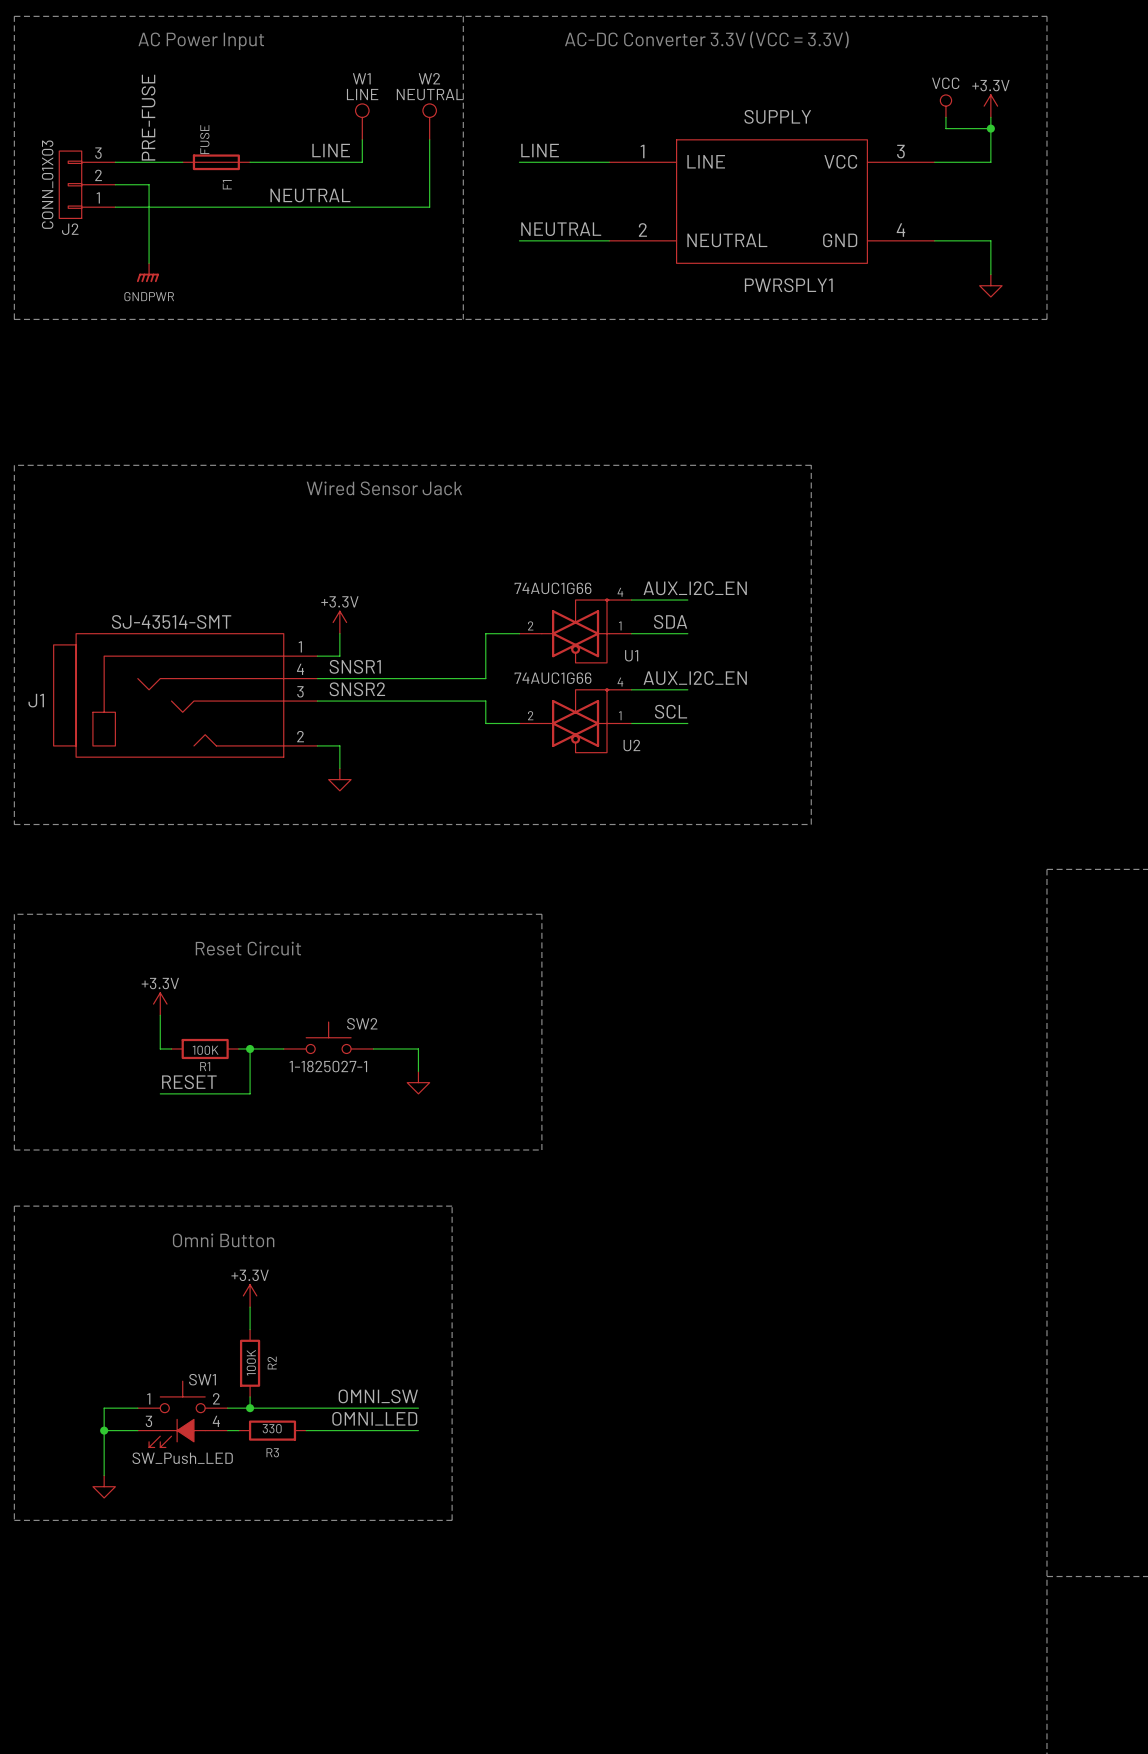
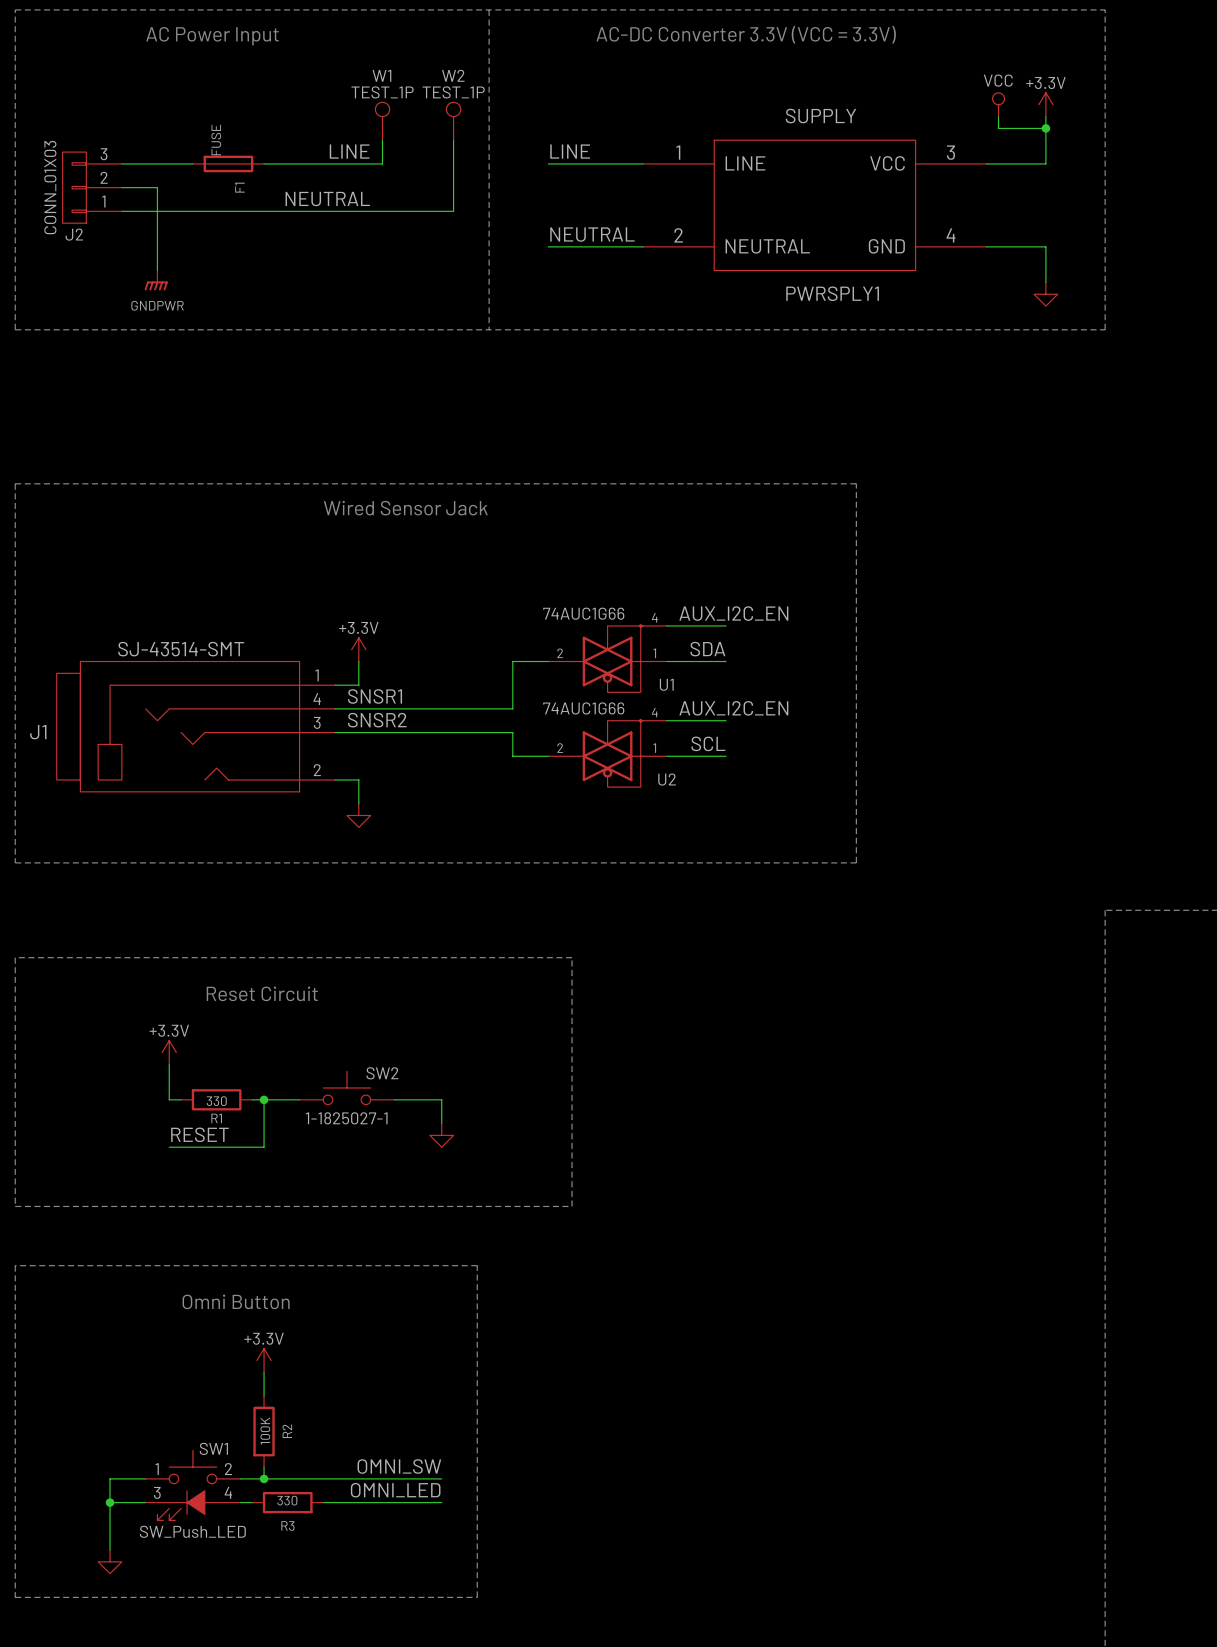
W1 value: LINE (362, 94) -> TEST_1P (382, 92)
W2 value: NEUTRAL (430, 94) -> TEST_1P (453, 92)
label: PRE-FUSE (148, 117) -> none
R1 value: 100K (205, 1050) -> 330 (216, 1101)

